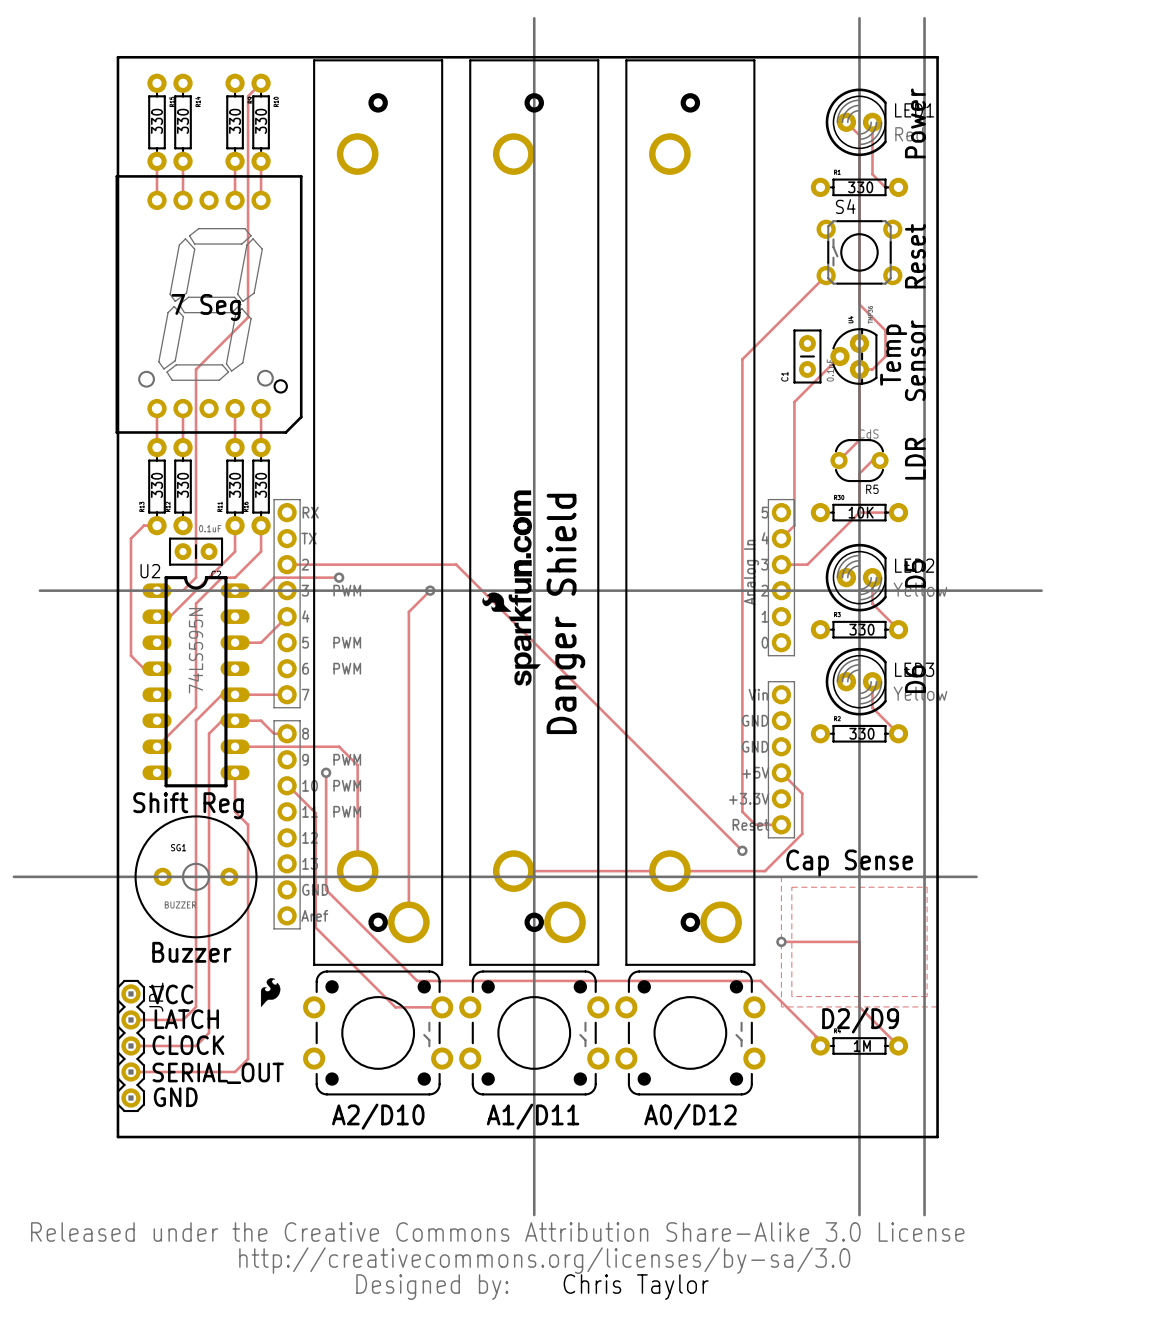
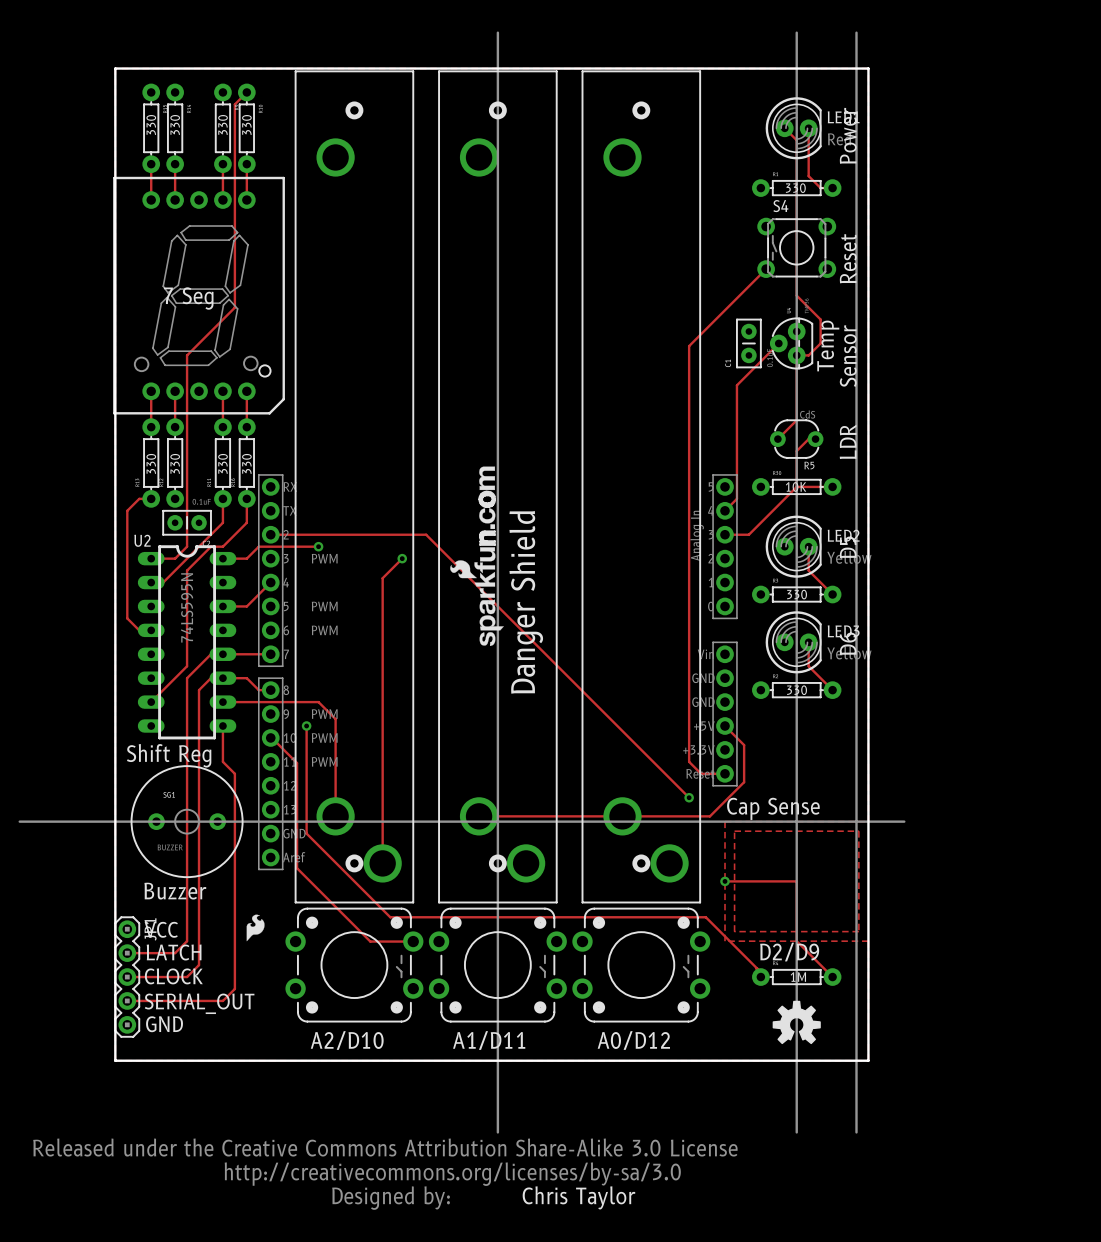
line: (39, 590) (1041, 590) -> none
drawing: none -> [772, 1000, 821, 1045]

